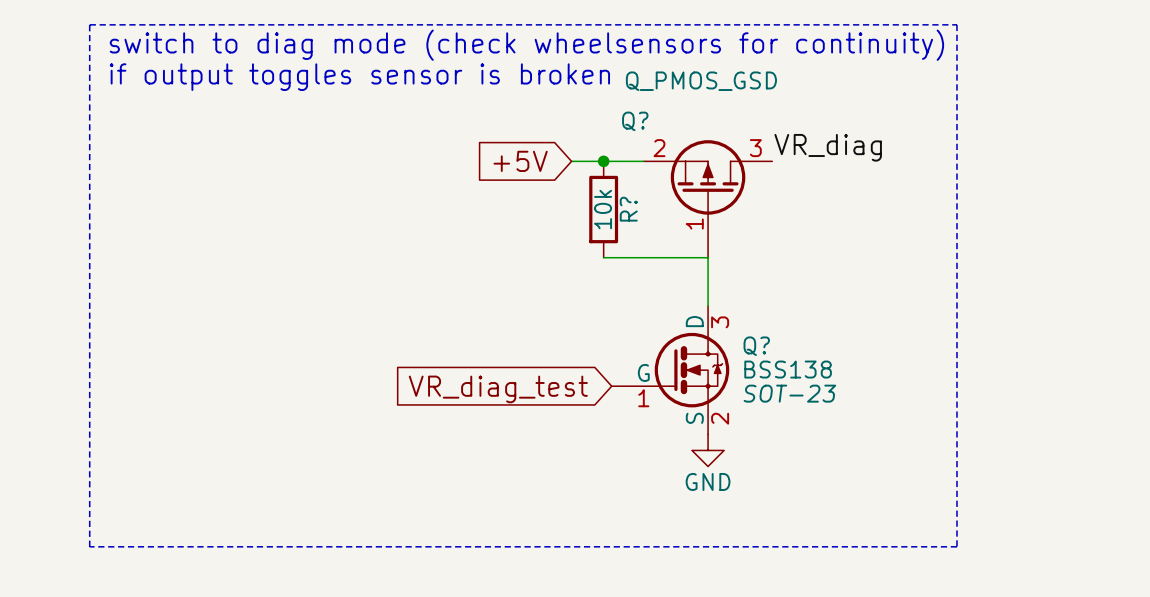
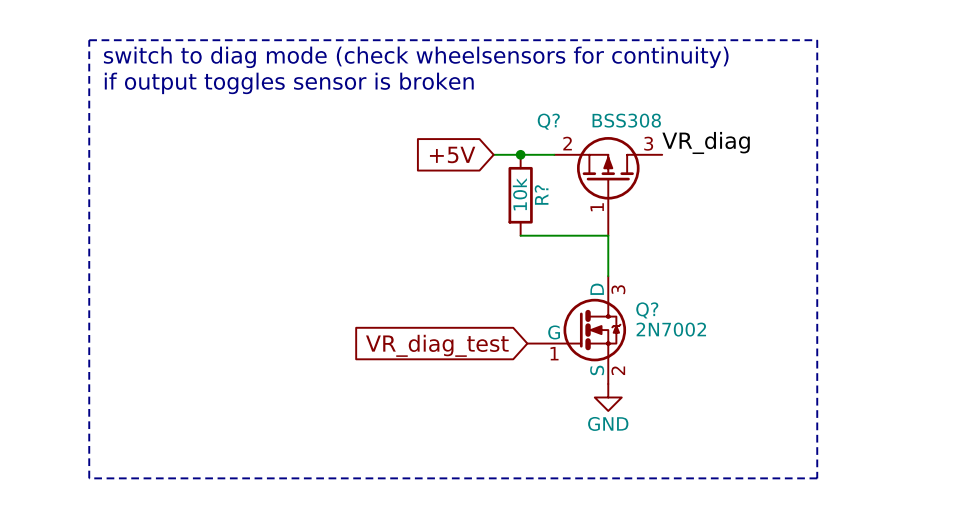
Q? value: Q_PMOS_GSD (701, 81) -> BSS308 (626, 120)
Q? value: BSS138 (788, 369) -> 2N7002 (671, 329)
Q? text: SOT-23 (789, 393) -> none

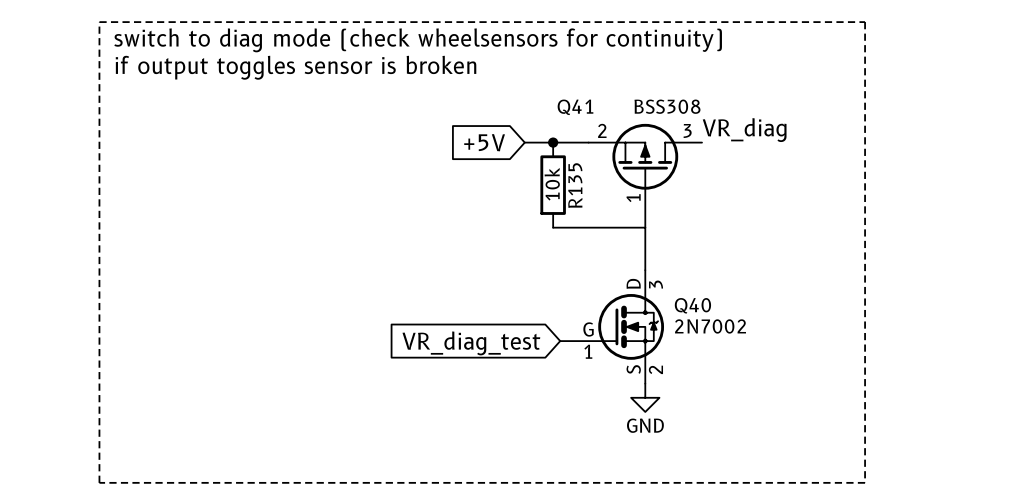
Q? name: Q? (548, 121) -> Q41 (575, 107)
R? name: R? (541, 194) -> R135 (575, 185)
Q? name: Q? (647, 310) -> Q40 (692, 305)

